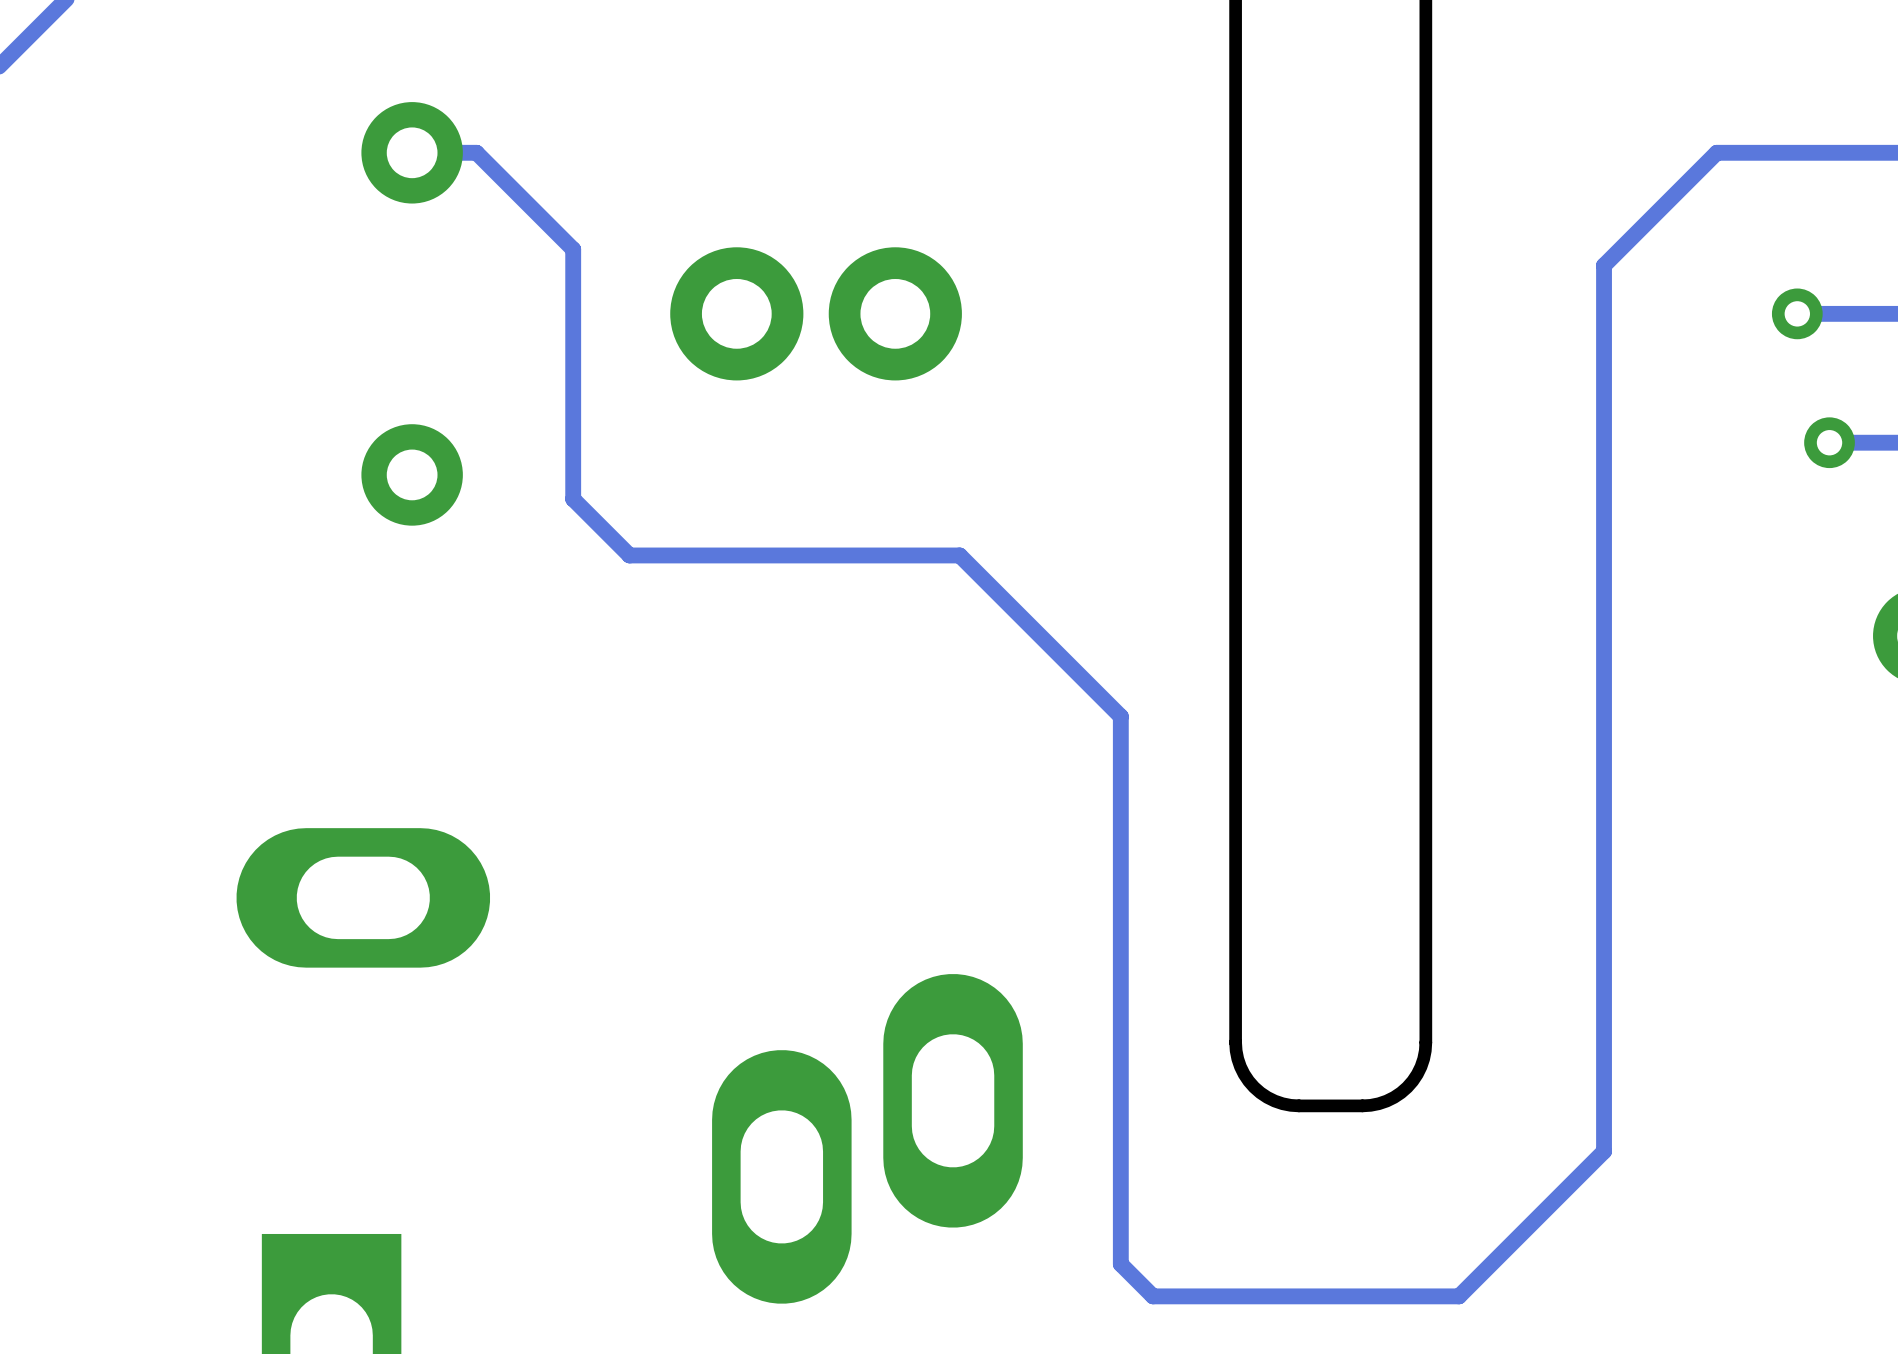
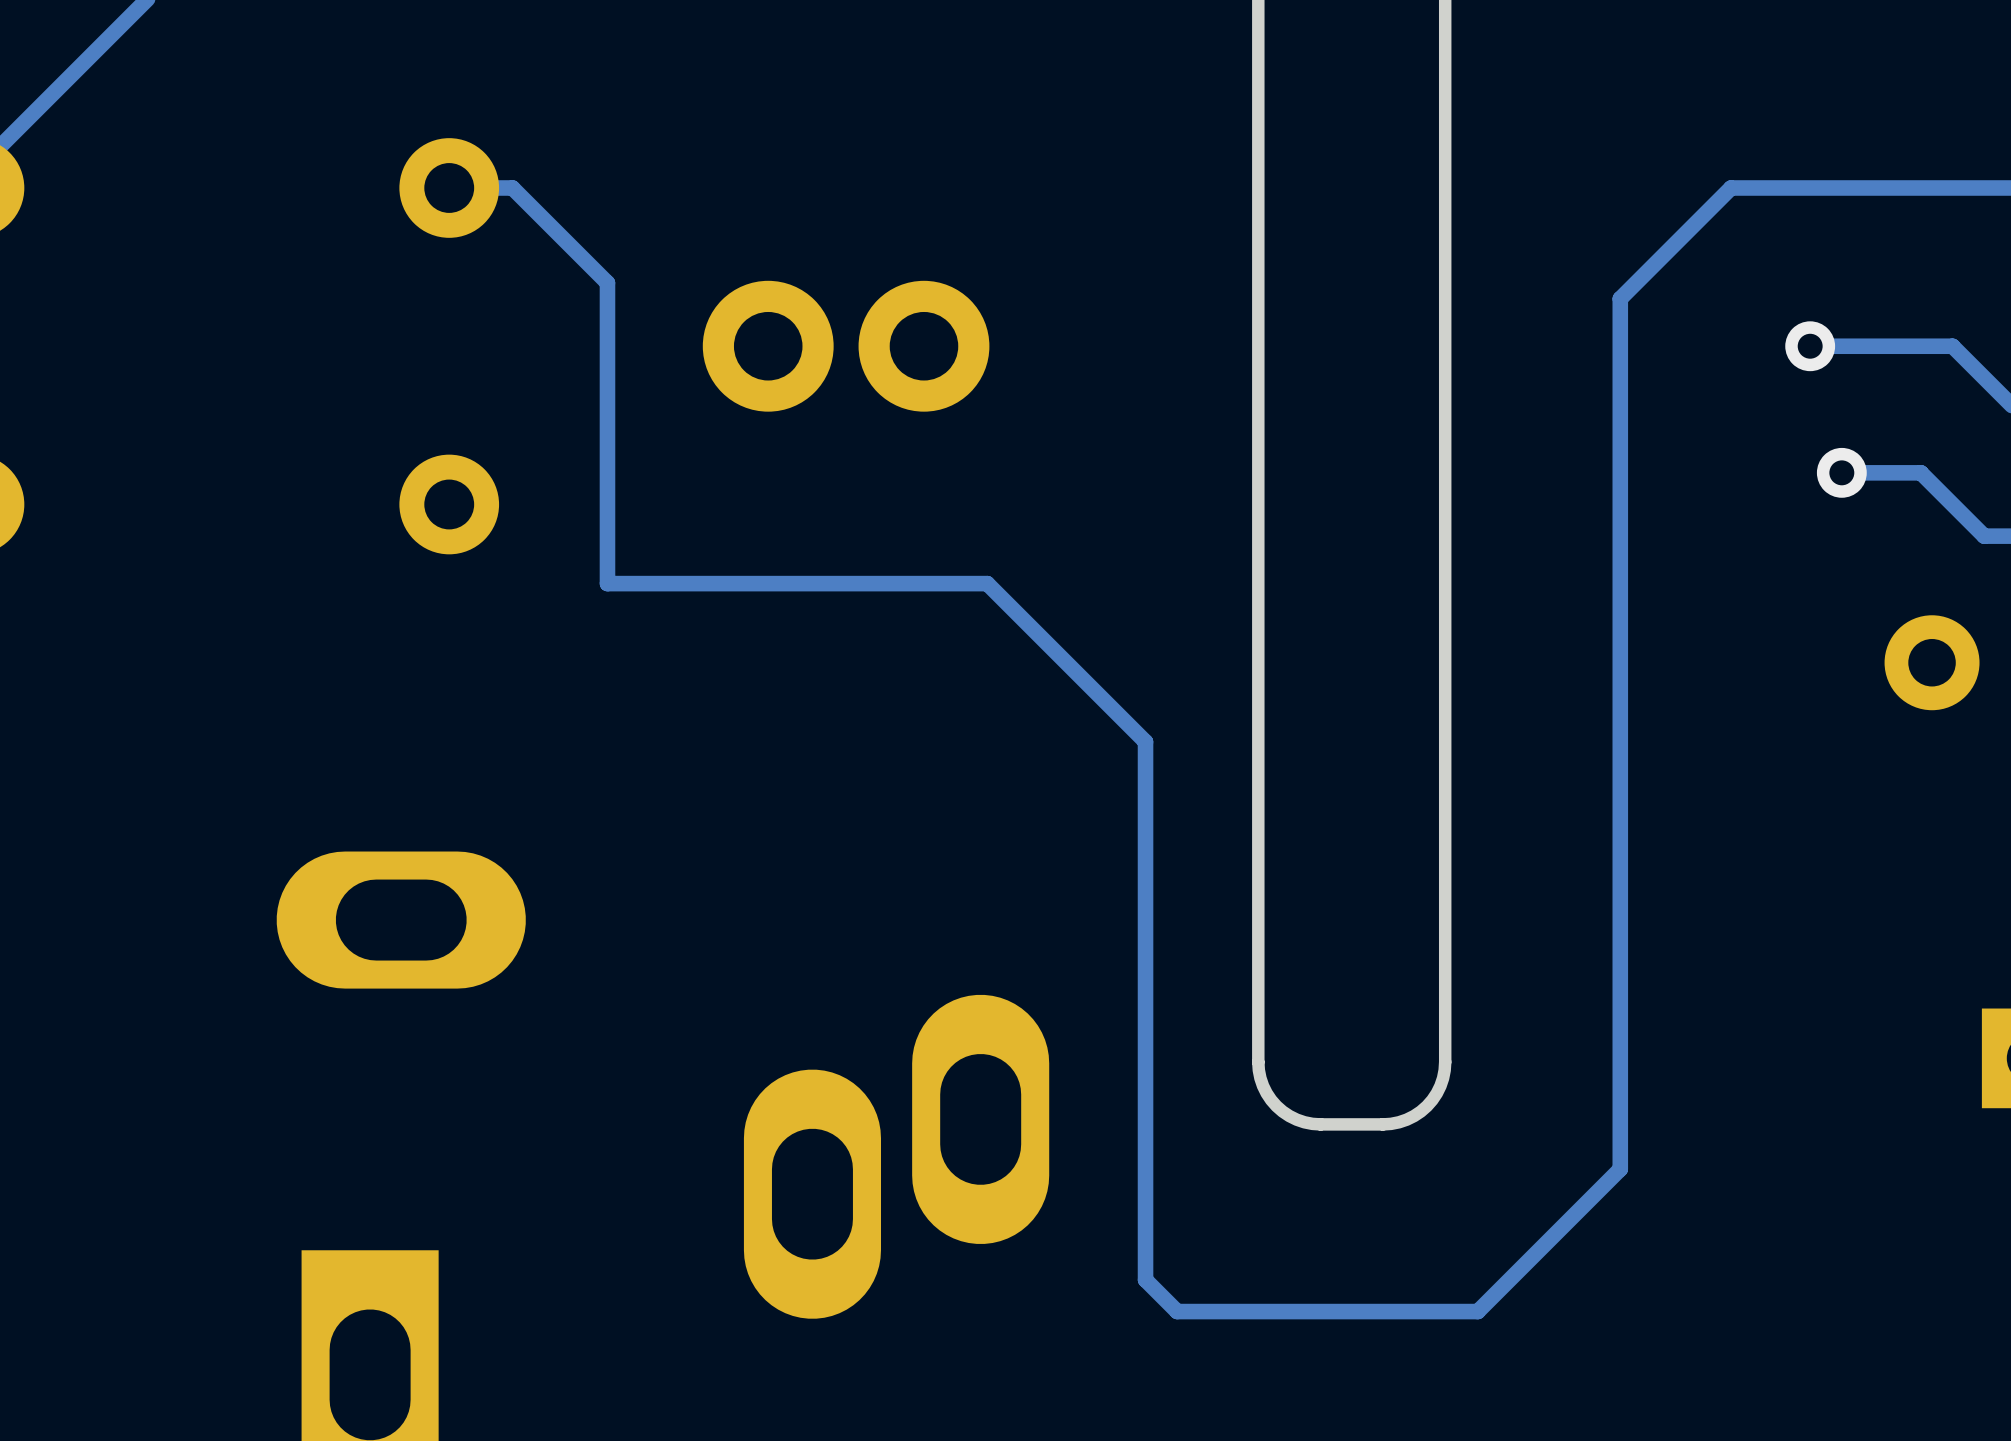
track: (573, 499) (629, 555) -> (607, 528) (607, 583) (662, 583)

